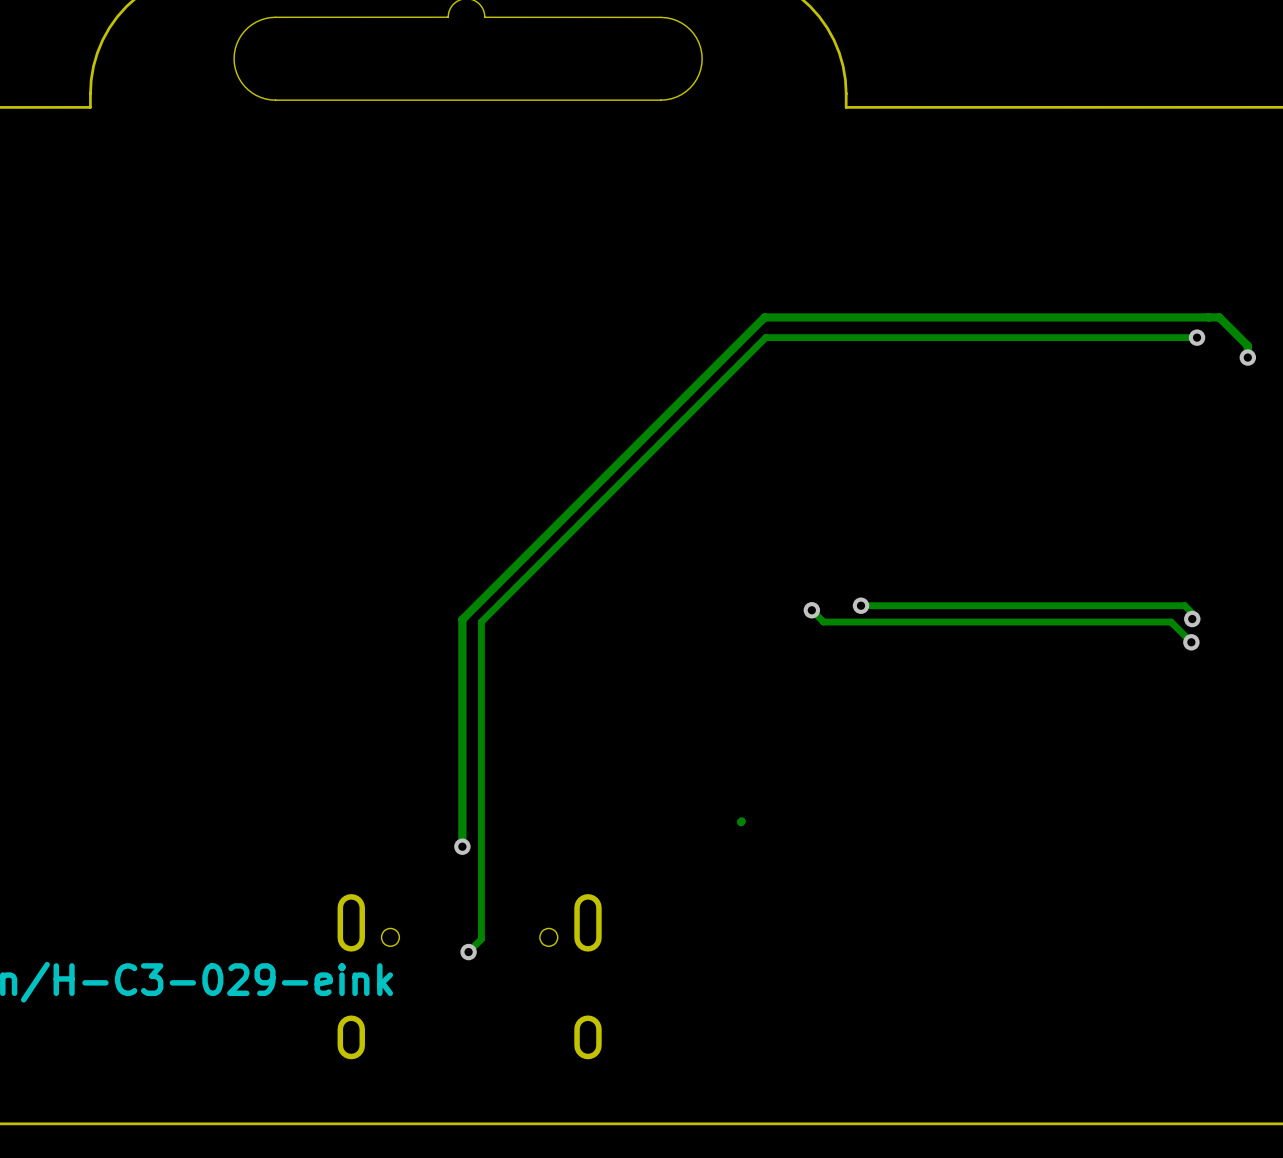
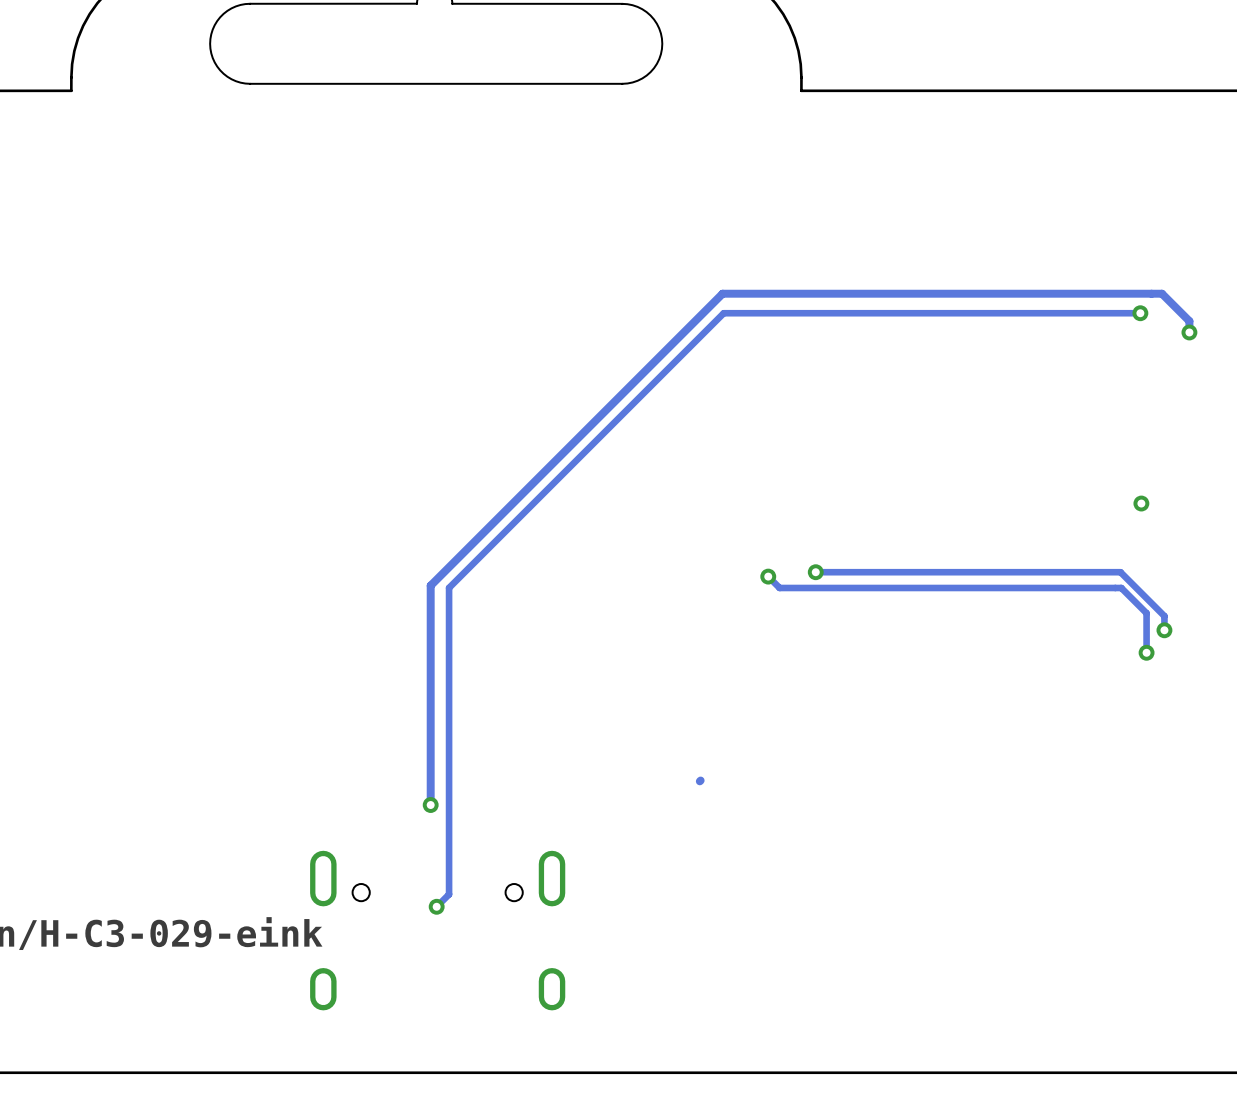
via: none -> (1141, 503)
track: (1176, 605) (1184, 605) (1192, 613) (1192, 619) -> (1120, 572) (1164, 616) (1164, 630)
via: (1192, 619) -> none
track: (1171, 622) (1191, 642) -> (1115, 587) (1121, 587) (1146, 613) (1146, 652)
via: (1191, 642) -> none
via: none -> (1164, 630)
via: none -> (1146, 652)

